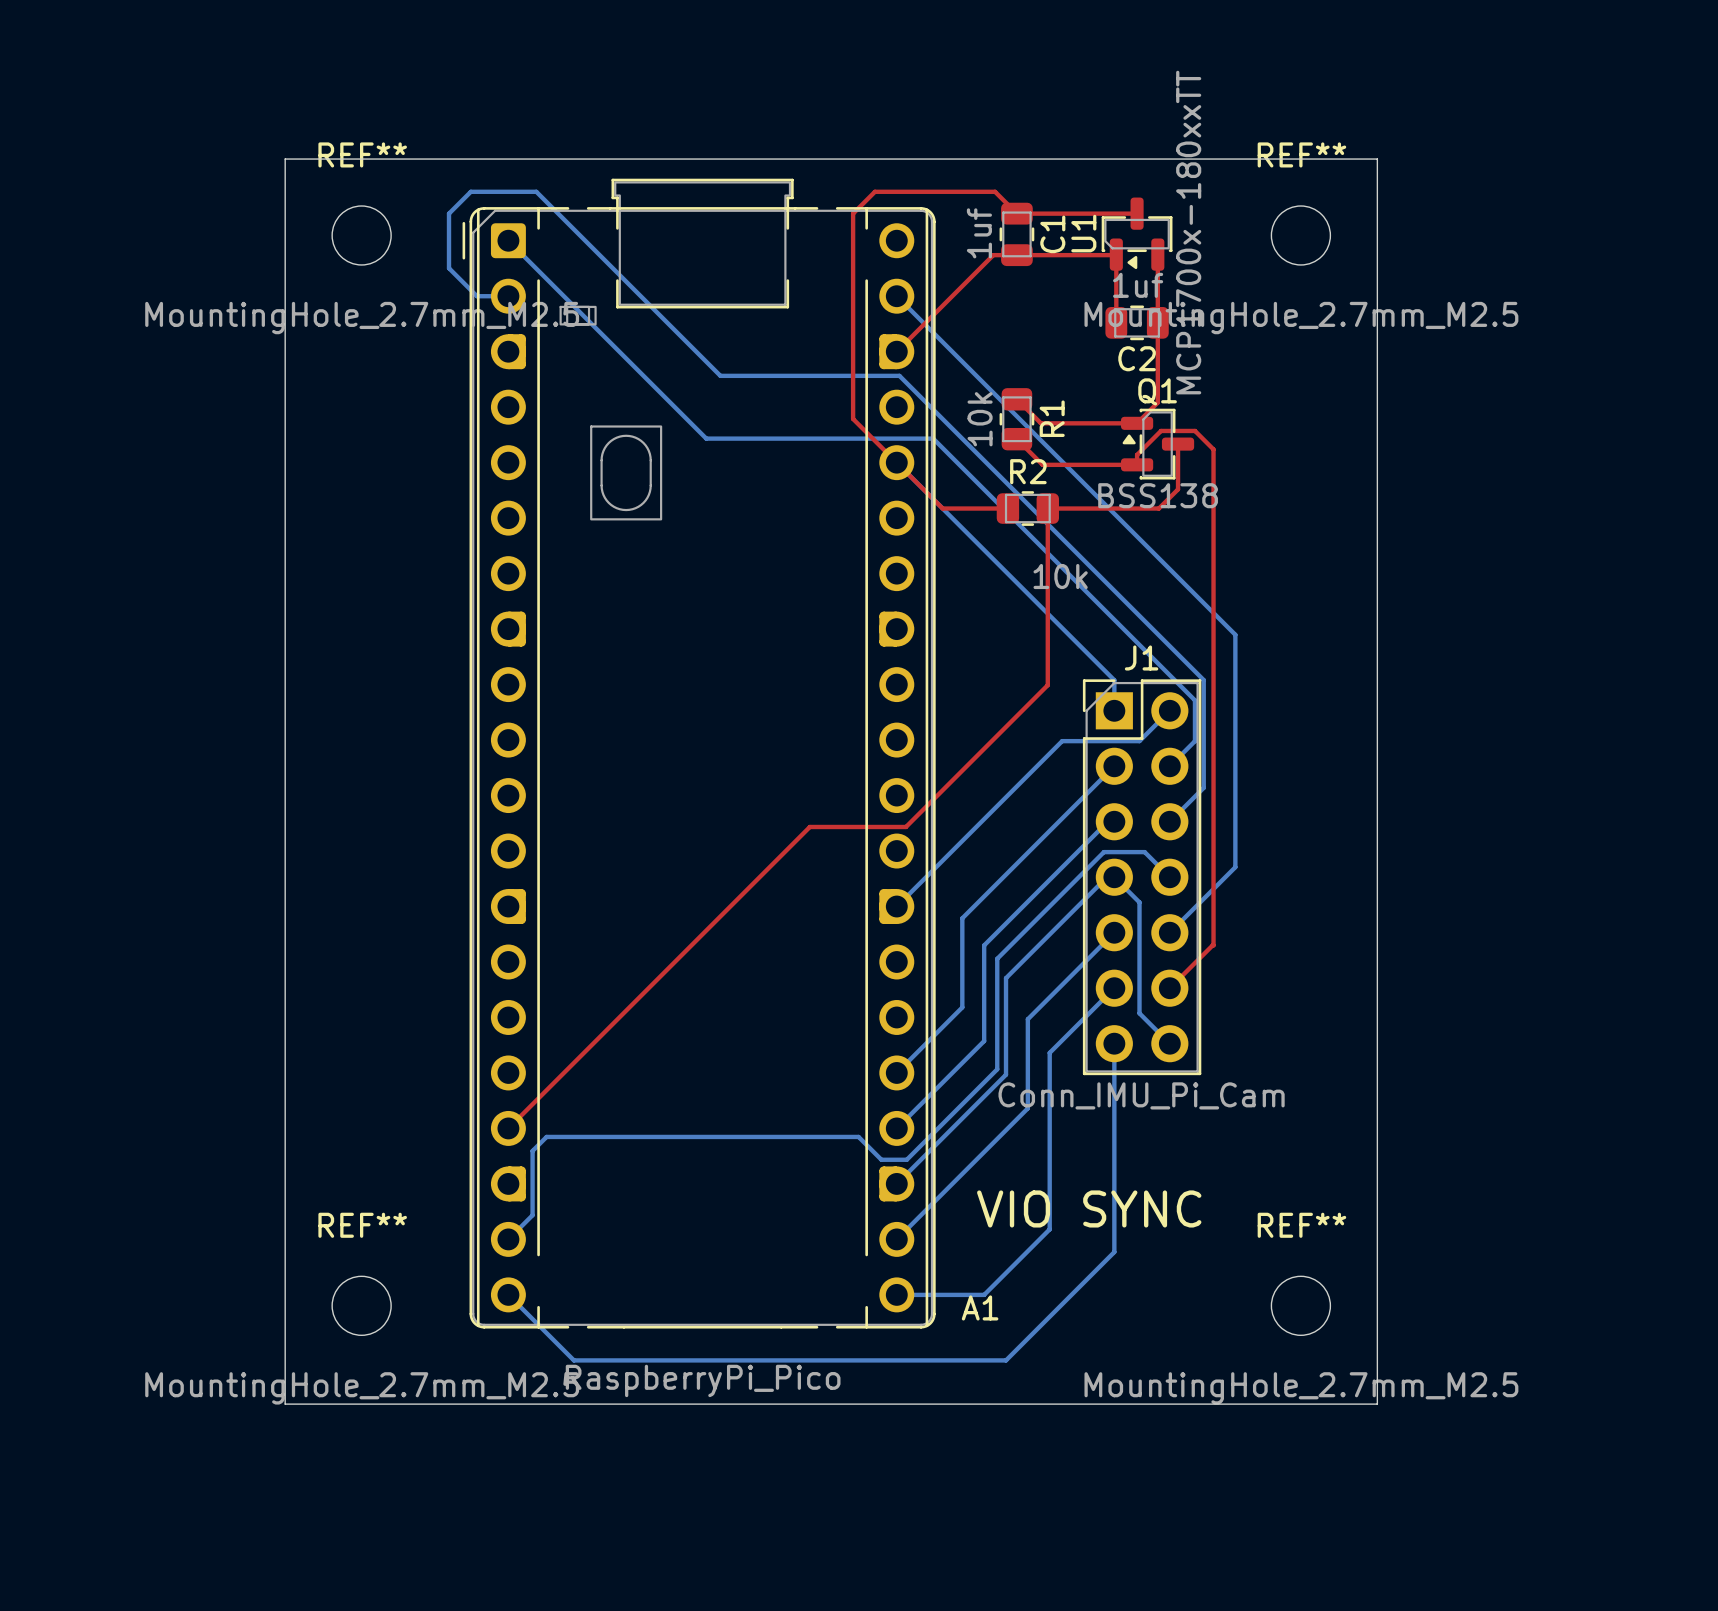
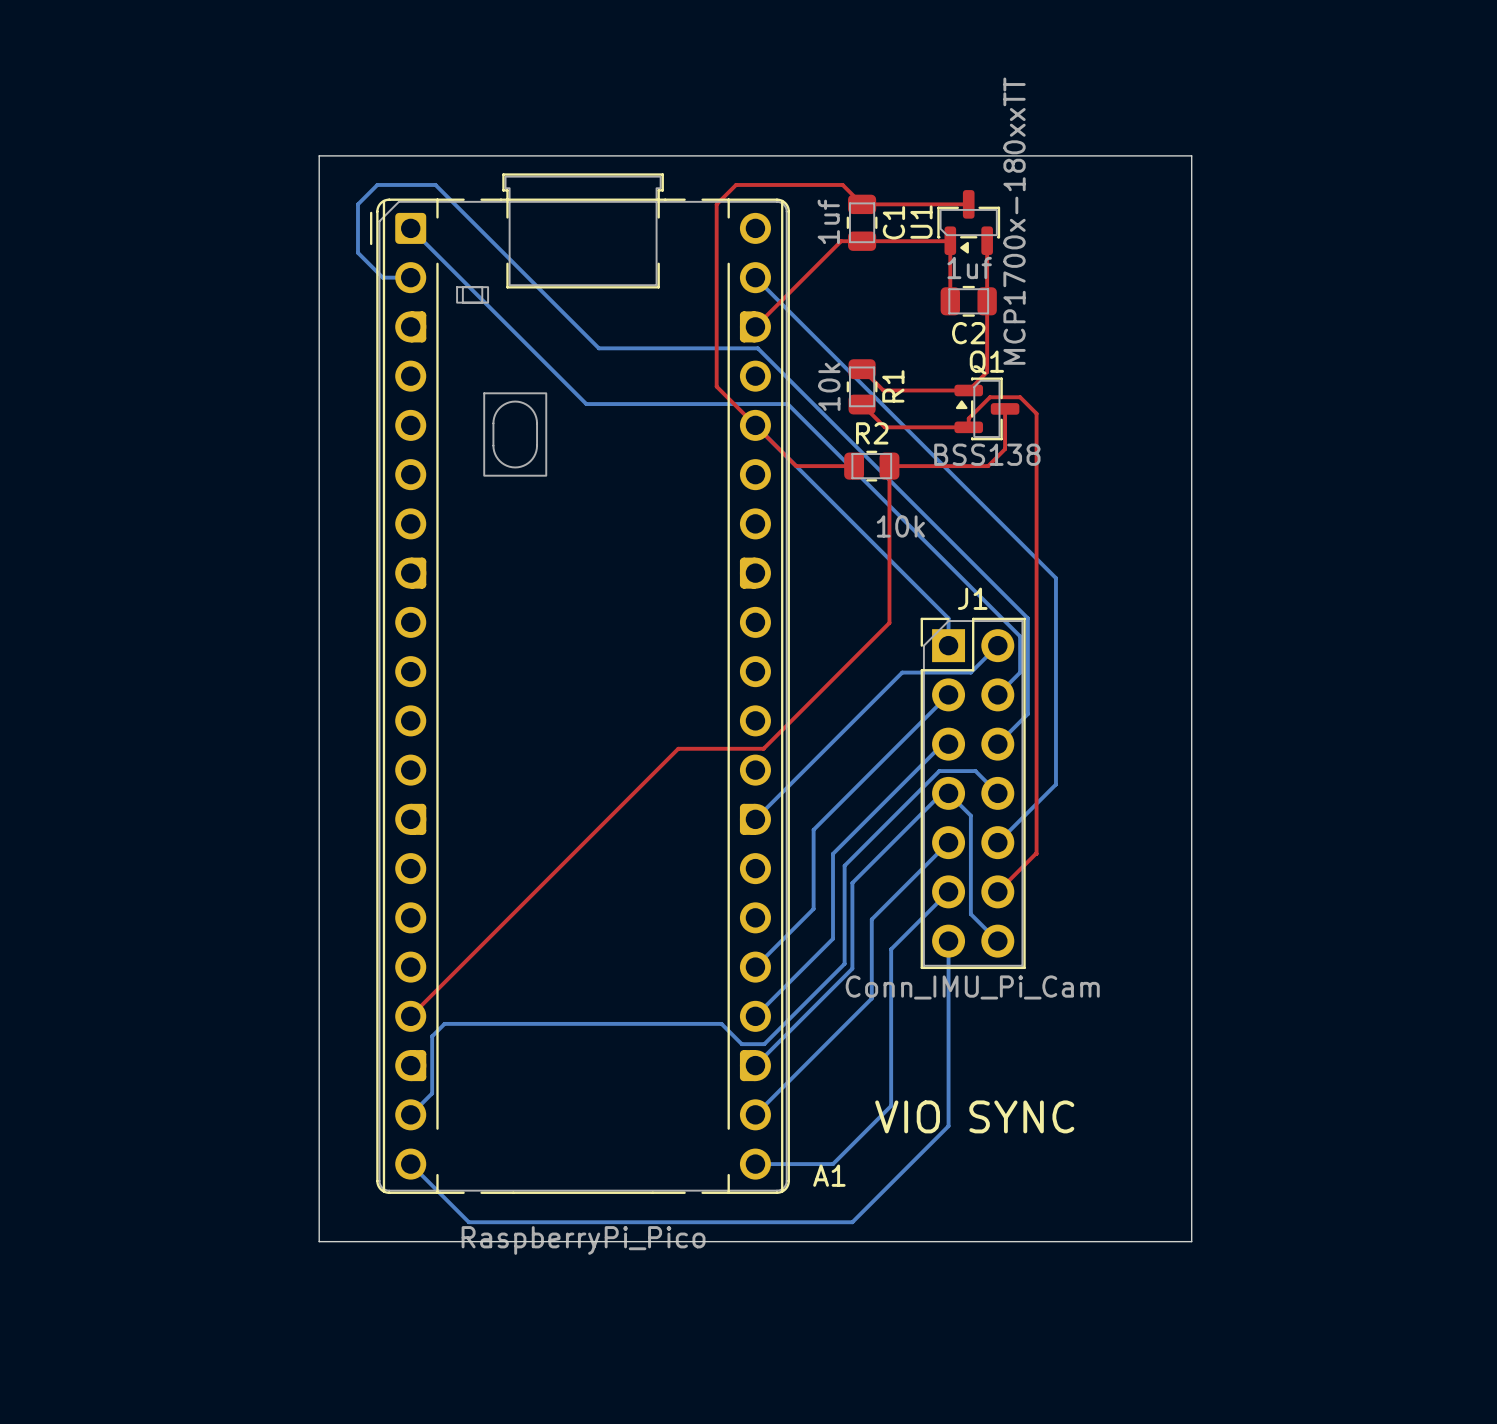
board edge: (405, 159) (285, 159) (285, 1404) (1377, 1404) (1377, 159) -> (319, 155) (319, 1241) (1191, 1241) (1191, 155) (1181, 155)
REF**: MountingHole_2.7mm_M2.5 (361, 235) -> none
REF**: MountingHole_2.7mm_M2.5 (1300, 235) -> none
text position: VIO SYNC (1089, 1208) -> VIO SYNC (974, 1116)
REF**: MountingHole_2.7mm_M2.5 (361, 1305) -> none
REF**: MountingHole_2.7mm_M2.5 (1300, 1305) -> none

